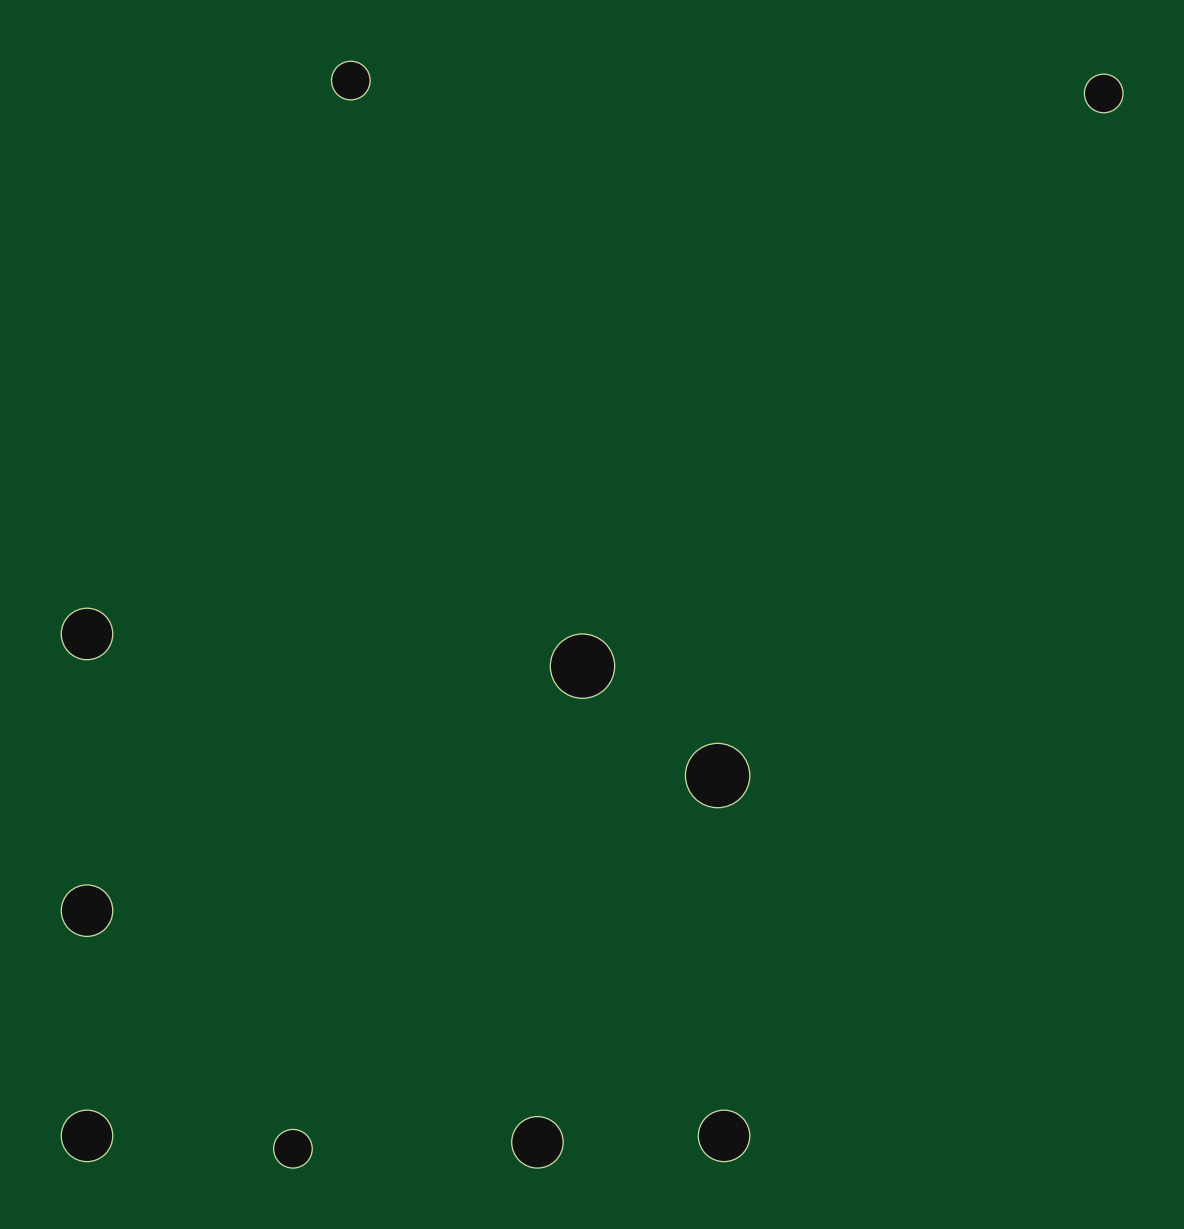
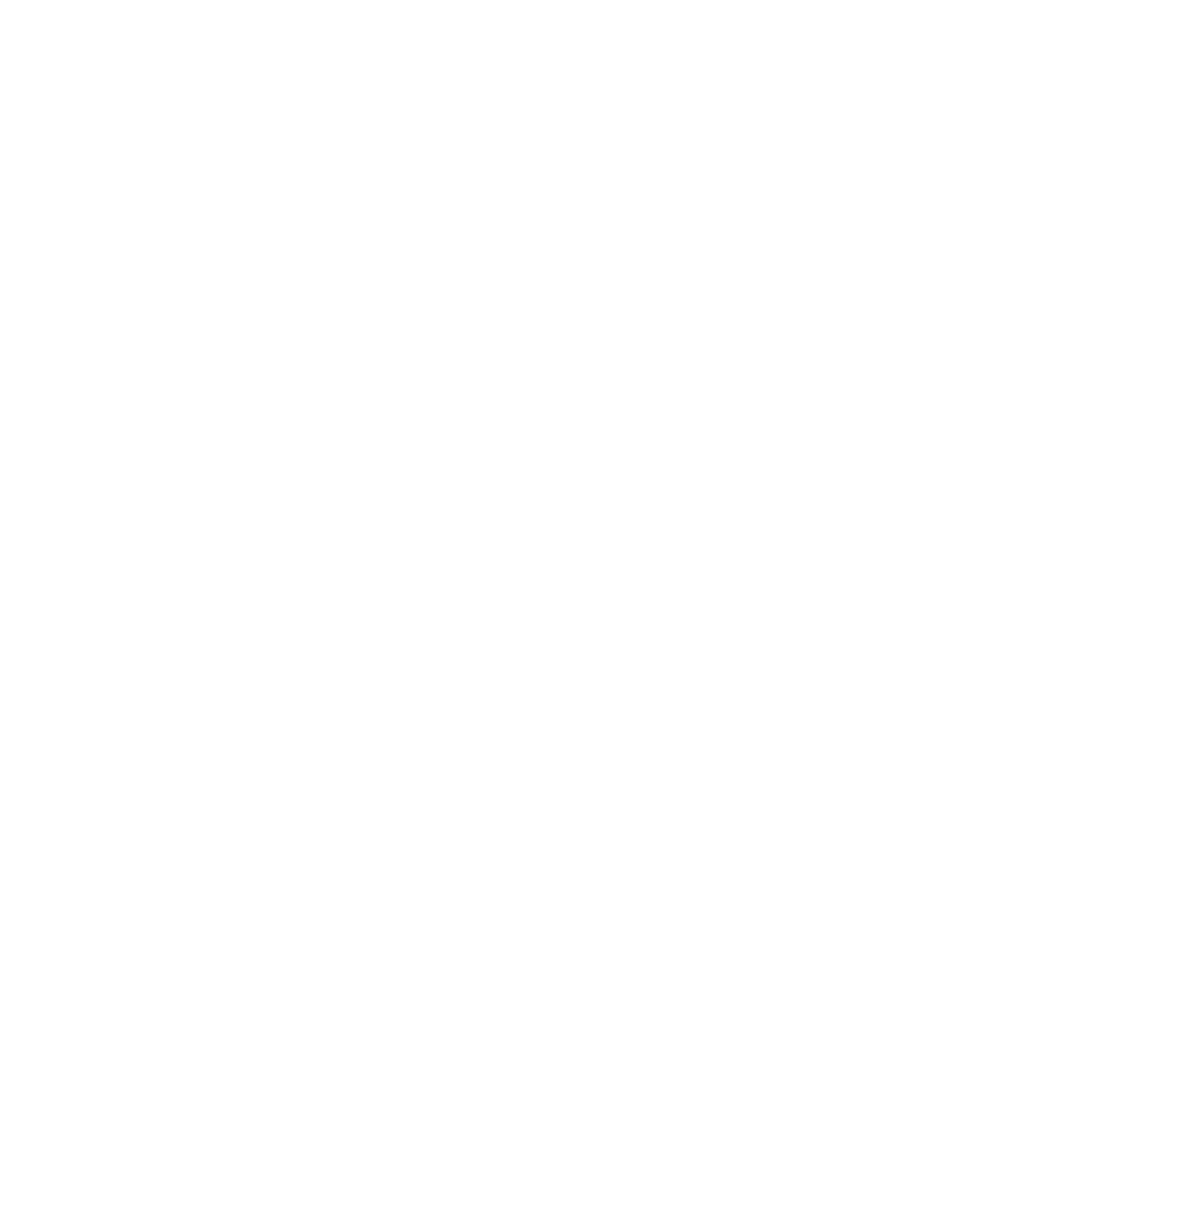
part: (350, 80) -> none
part: (1103, 93) -> none
part: (87, 633) -> none
part: (582, 666) -> none
part: (717, 775) -> none
part: (87, 910) -> none
part: (87, 1135) -> none
part: (724, 1135) -> none
part: (537, 1142) -> none
part: (292, 1148) -> none

